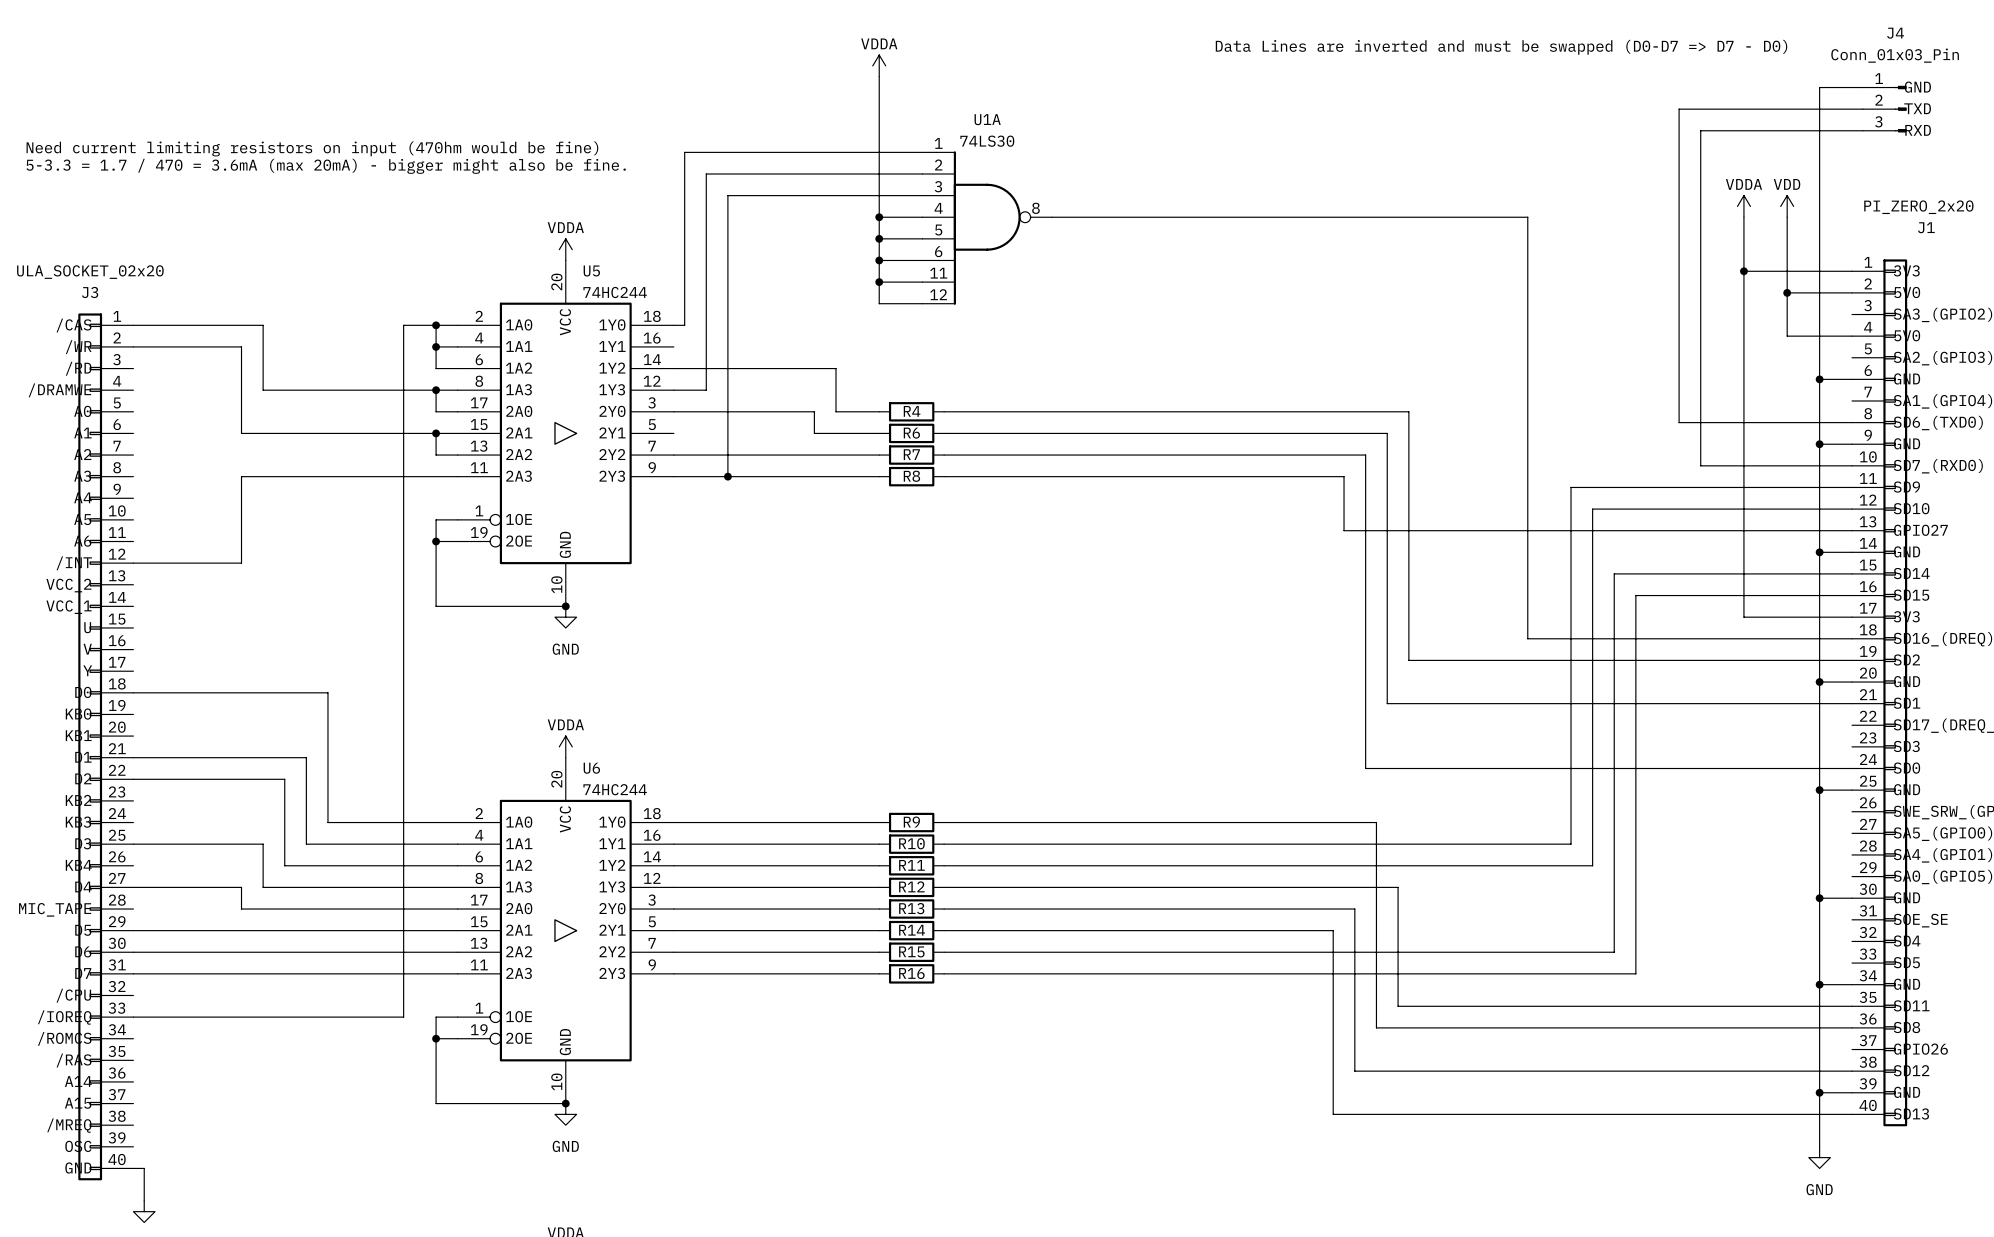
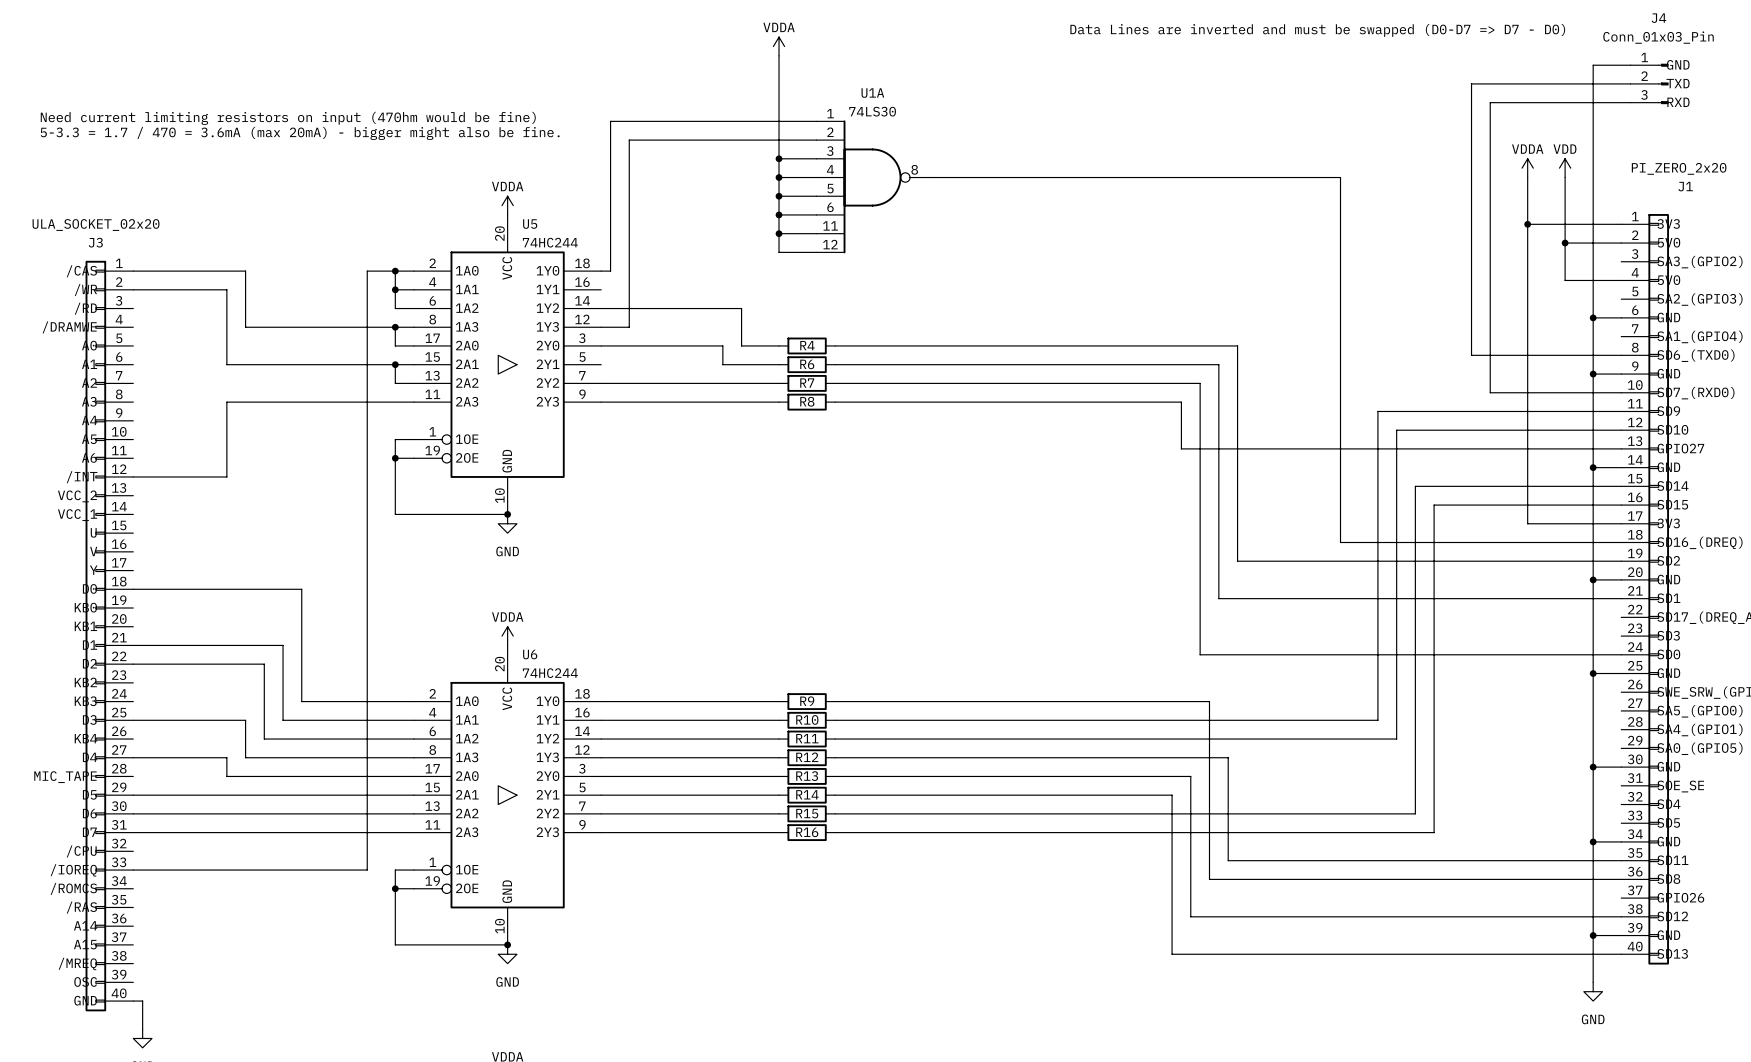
wire: (879, 195) (727, 195) (727, 476) -> none
junction: none -> (779, 158)
junction: (727, 476) -> none

